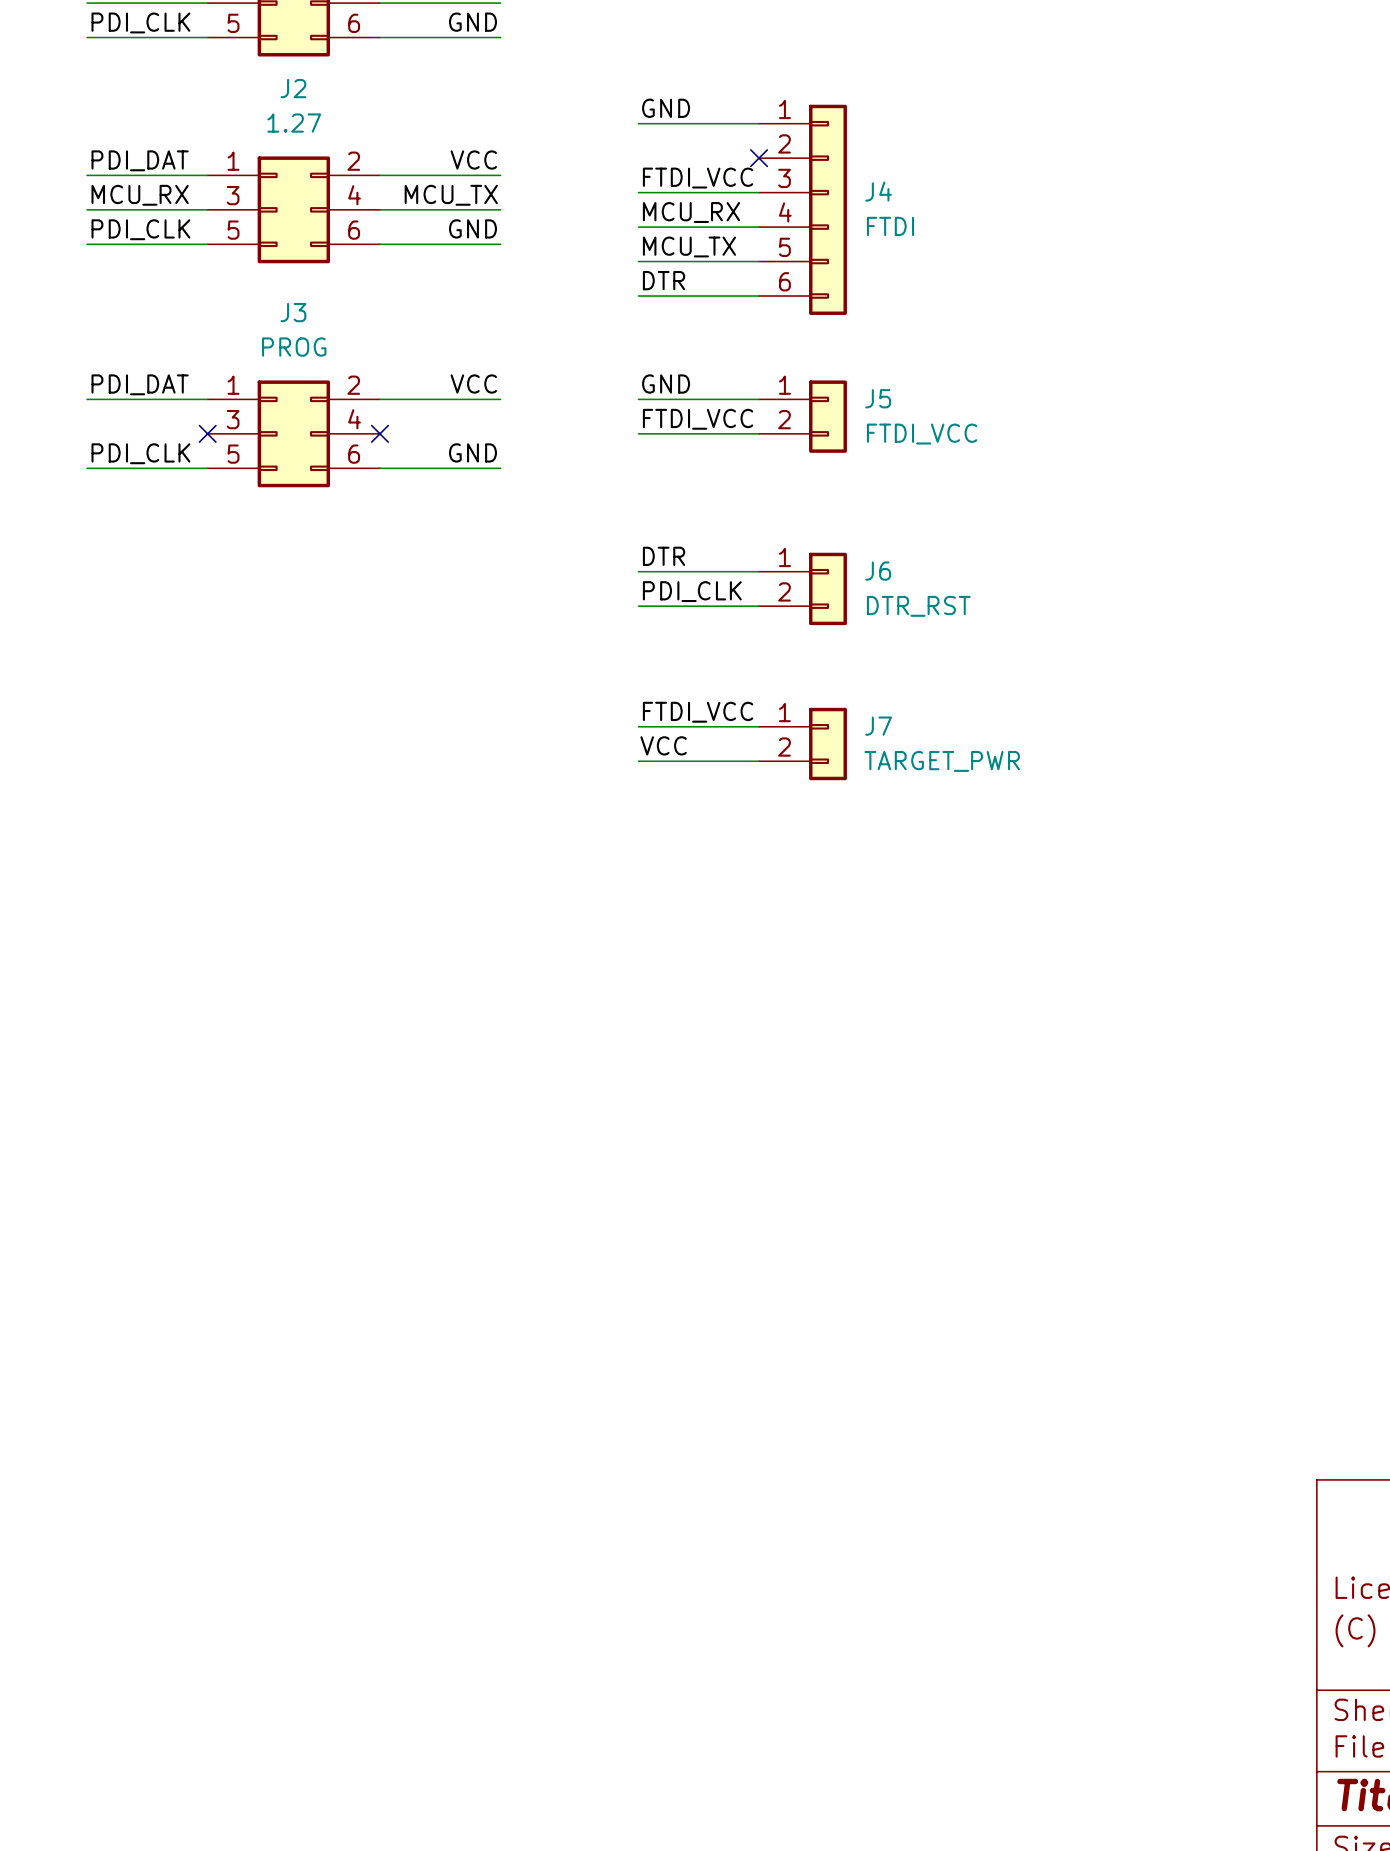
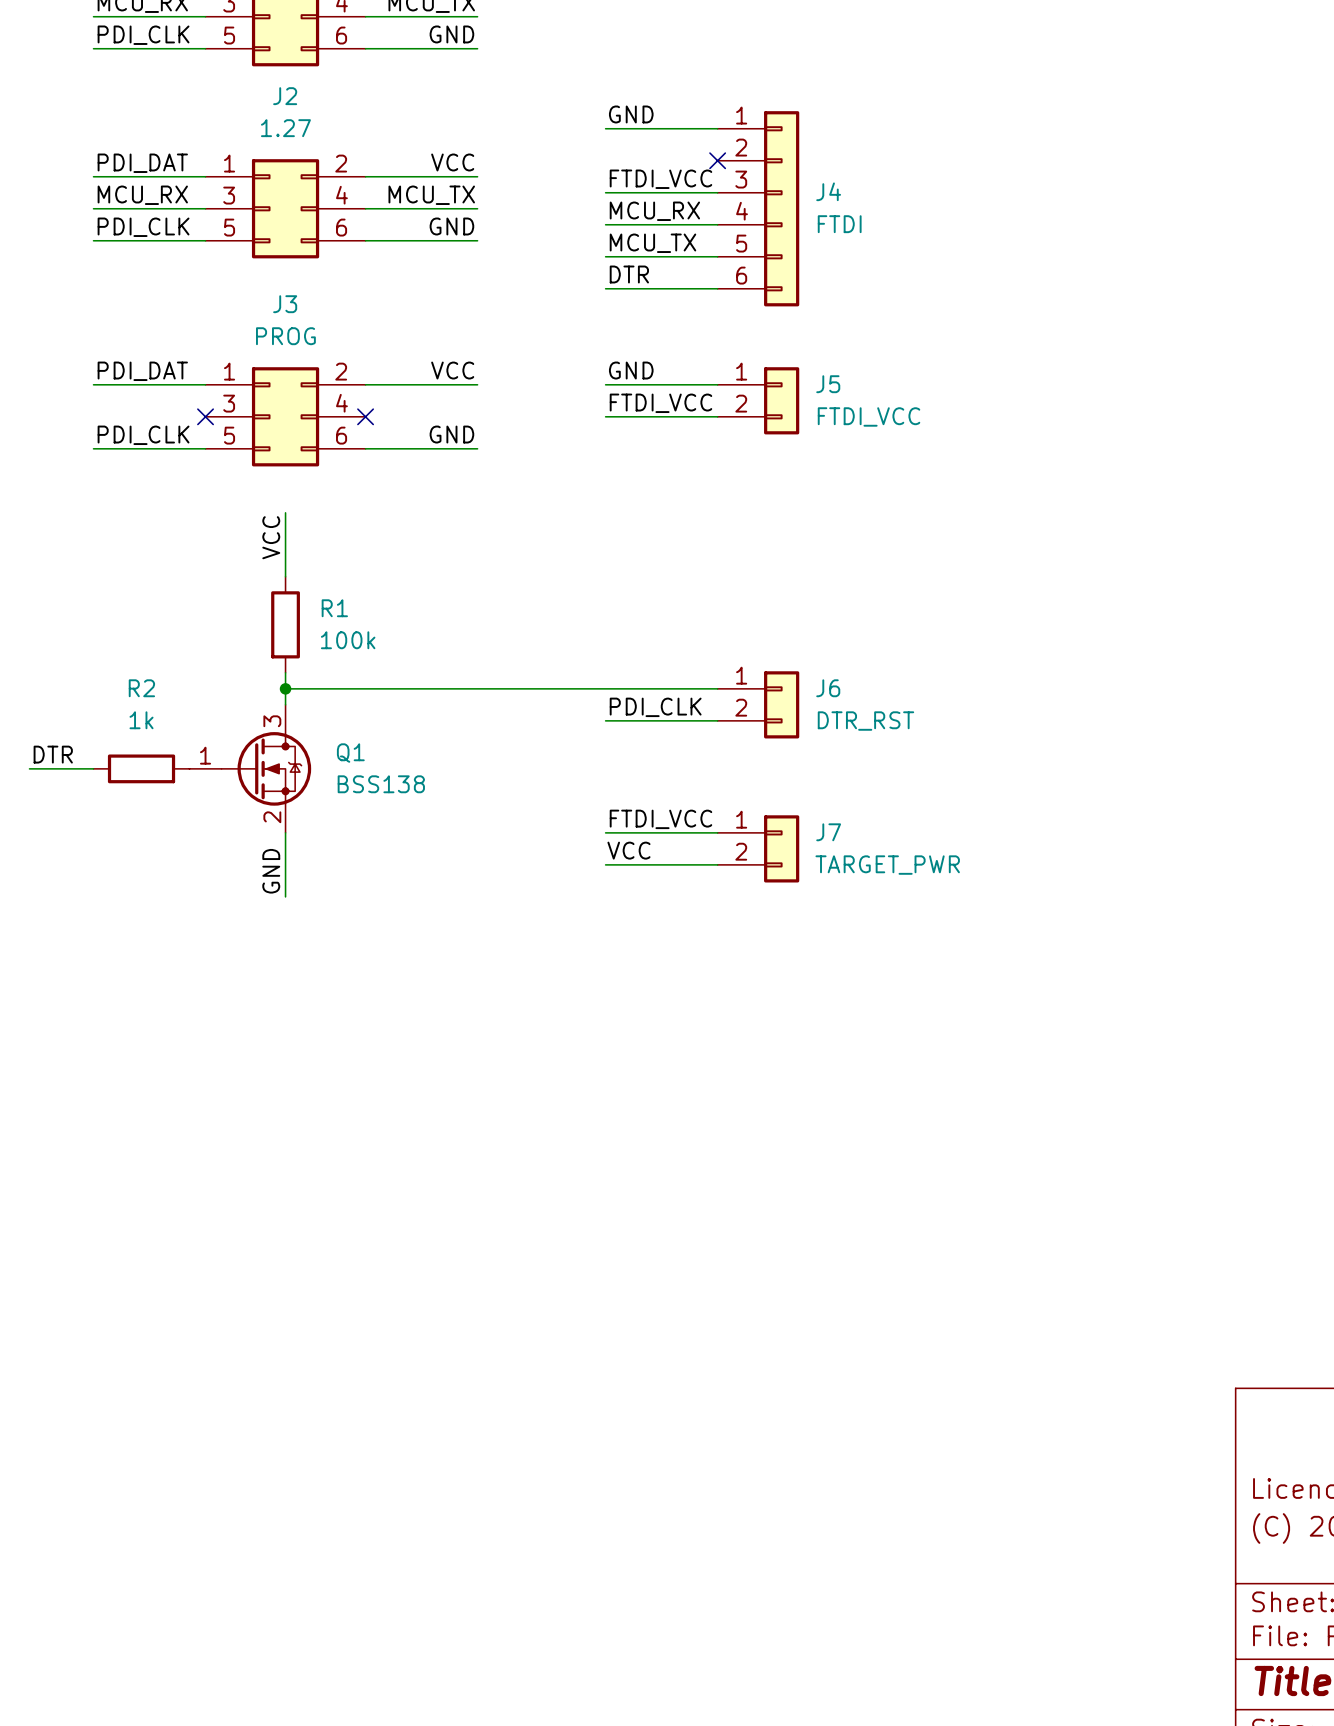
wire: none -> (285, 512) (285, 576)
label: DTR (664, 556) -> none
label: none -> VCC (271, 537)
wire: (638, 571) (759, 571) -> (605, 832) (717, 832)
J6: DTR_RST (803, 588) -> none
label: PDI_CLK (692, 591) -> none
wire: (638, 606) (759, 606) -> (605, 864) (717, 864)
R1: none -> 100k (285, 624)
wire: none -> (285, 672) (285, 704)
label position: FTDI_VCC (698, 712) -> FTDI_VCC (660, 819)
wire: none -> (285, 688) (605, 688)
junction: none -> (285, 688)
J7 name: J7 (878, 726) -> J6 (828, 688)
label: VCC (663, 745) -> PDI_CLK (655, 707)
J7 value: TARGET_PWR (942, 761) -> DTR_RST (865, 721)
label: none -> DTR (53, 754)
wire: none -> (29, 768) (93, 768)
R2: none -> 1k (141, 768)
Q1: none -> BSS138 (250, 768)
wire: none -> (285, 832) (285, 896)
J7: none -> TARGET_PWR (758, 848)
label: none -> VCC (628, 850)
label: none -> GND (271, 871)

